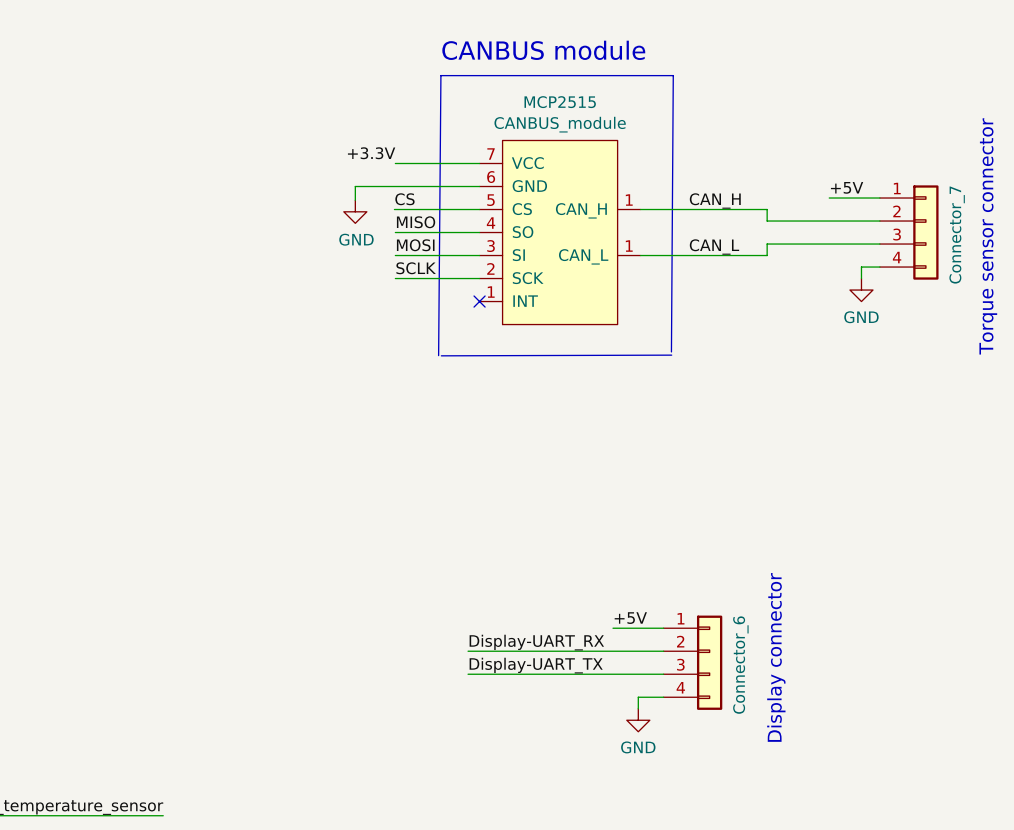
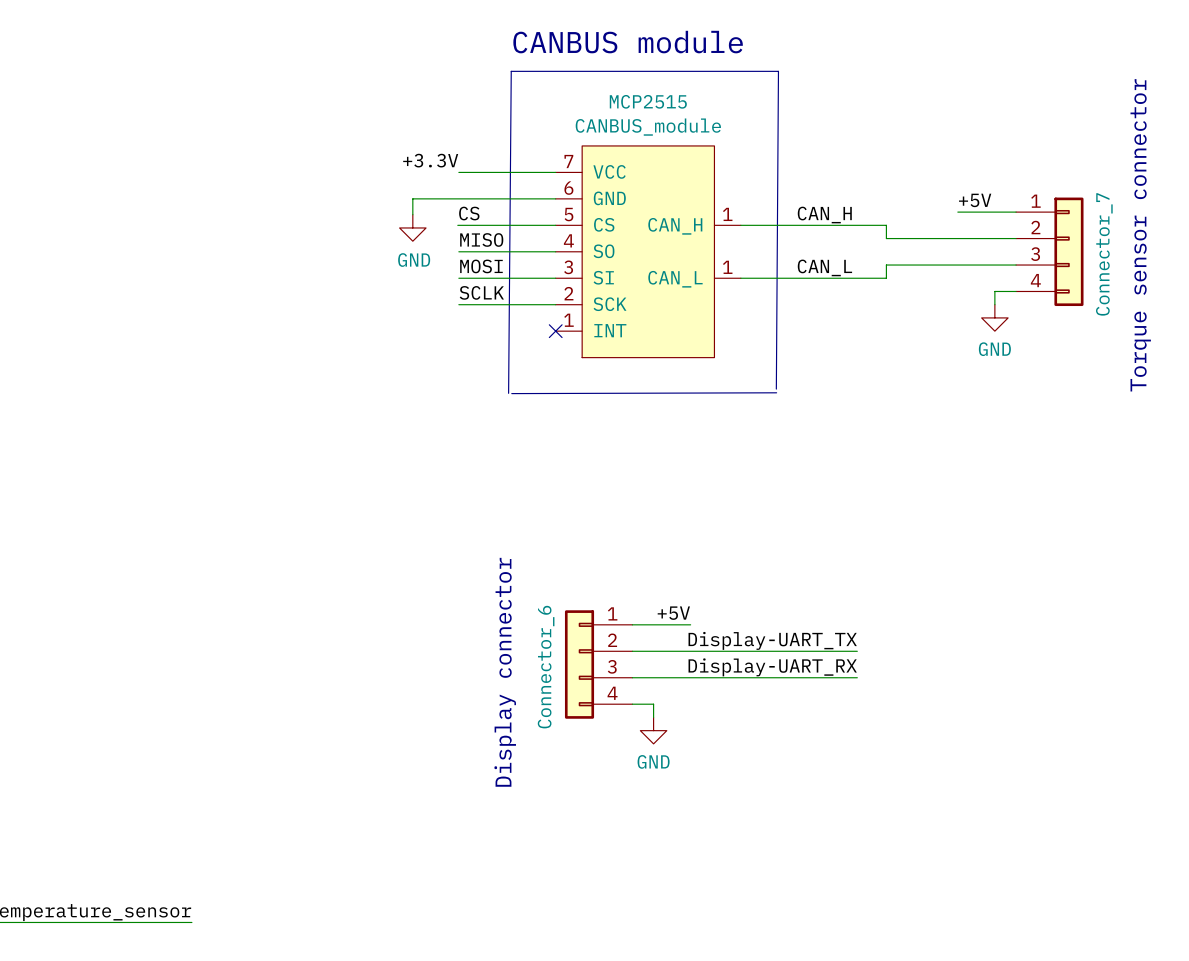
label: none -> Display-UART_TX (772, 640)
part: none -> Connector_6 (598, 664)
label: none -> Display-UART_RX (772, 667)
text: none -> Display connector (505, 672)
label position: +5V (630, 618) -> +5V (673, 613)
wire: none -> (632, 704) (653, 704) (653, 717)
wire: (613, 628) (663, 628) -> (632, 624) (690, 624)
label: Display-UART_RX (536, 642) -> none
wire: (468, 651) (663, 651) -> (632, 651) (857, 651)
text: Display connector (776, 657) -> none
part: Connector_6 (692, 662) -> none
label: Display-UART_TX (536, 665) -> none
wire: (468, 674) (663, 674) -> (632, 677) (857, 677)
wire: (663, 697) (638, 697) (638, 708) -> none
power symbol position: GND (638, 720) -> GND (653, 730)

